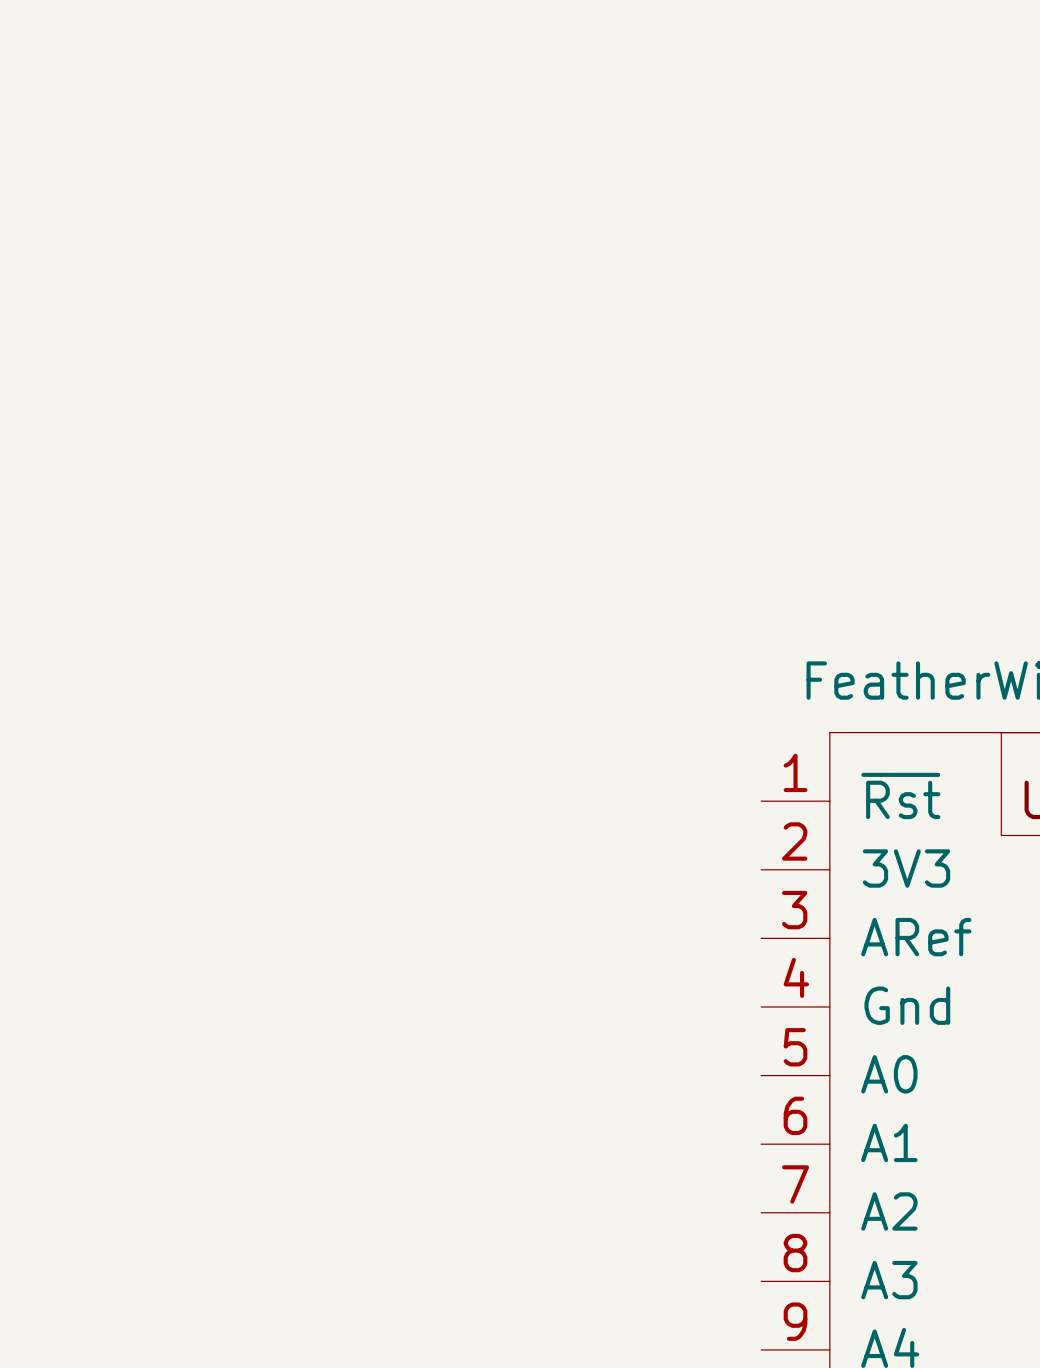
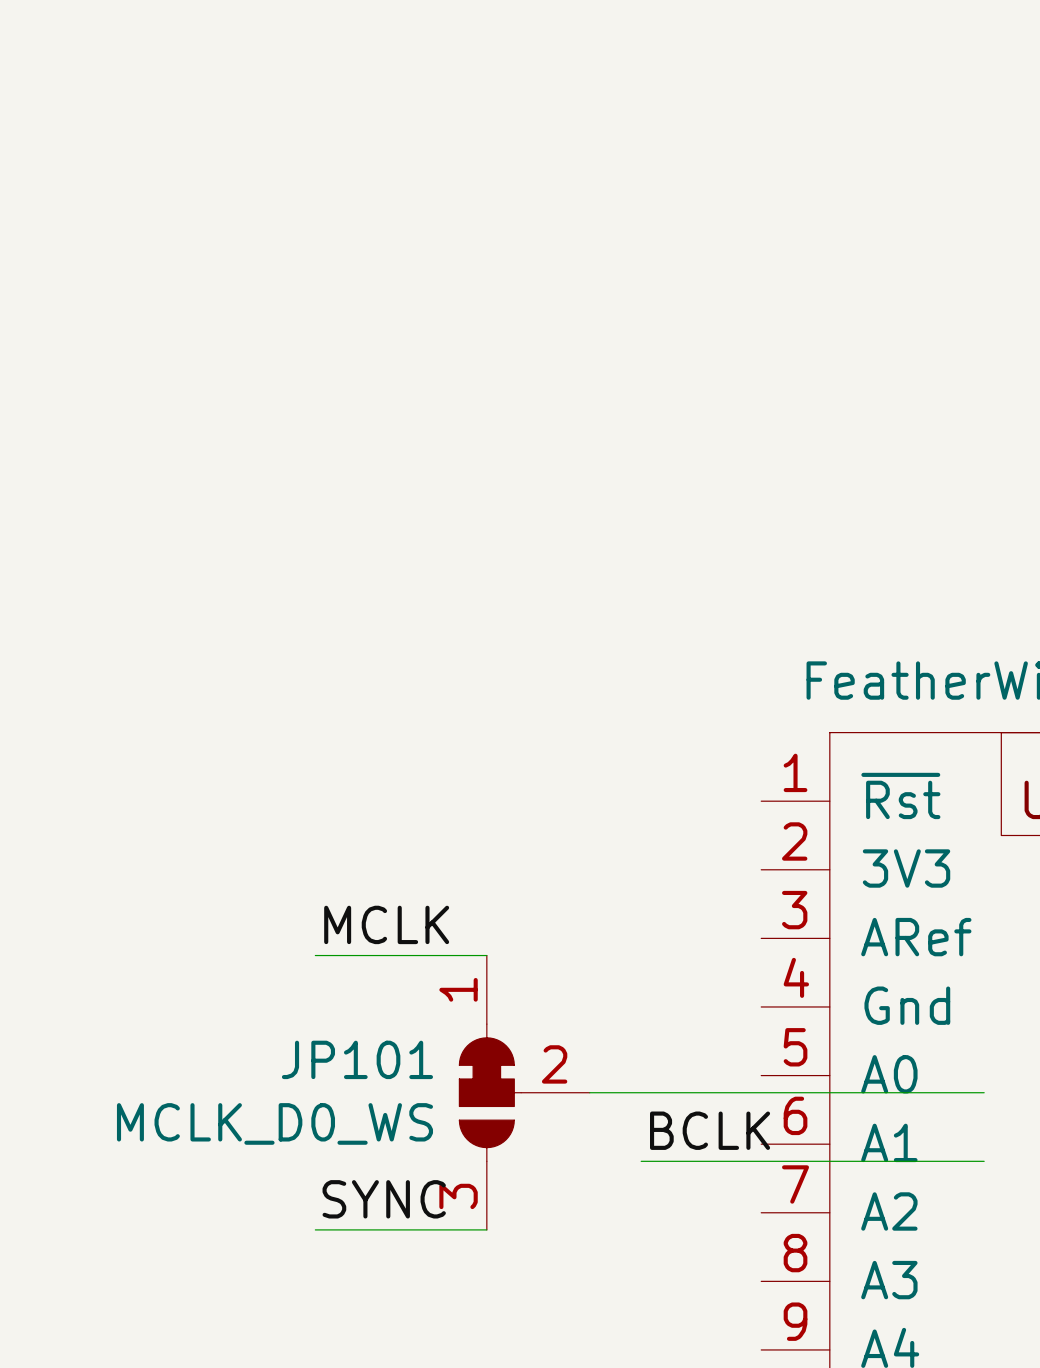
label: none -> MCLK (386, 924)
wire: none -> (315, 955) (486, 955)
JP101: none -> MCLK_D0_WS (524, 1092)
wire: none -> (589, 1092) (984, 1092)
label: none -> BCLK (710, 1130)
wire: none -> (641, 1161) (984, 1161)
label: none -> SYNC (384, 1199)
wire: none -> (315, 1229) (486, 1229)

